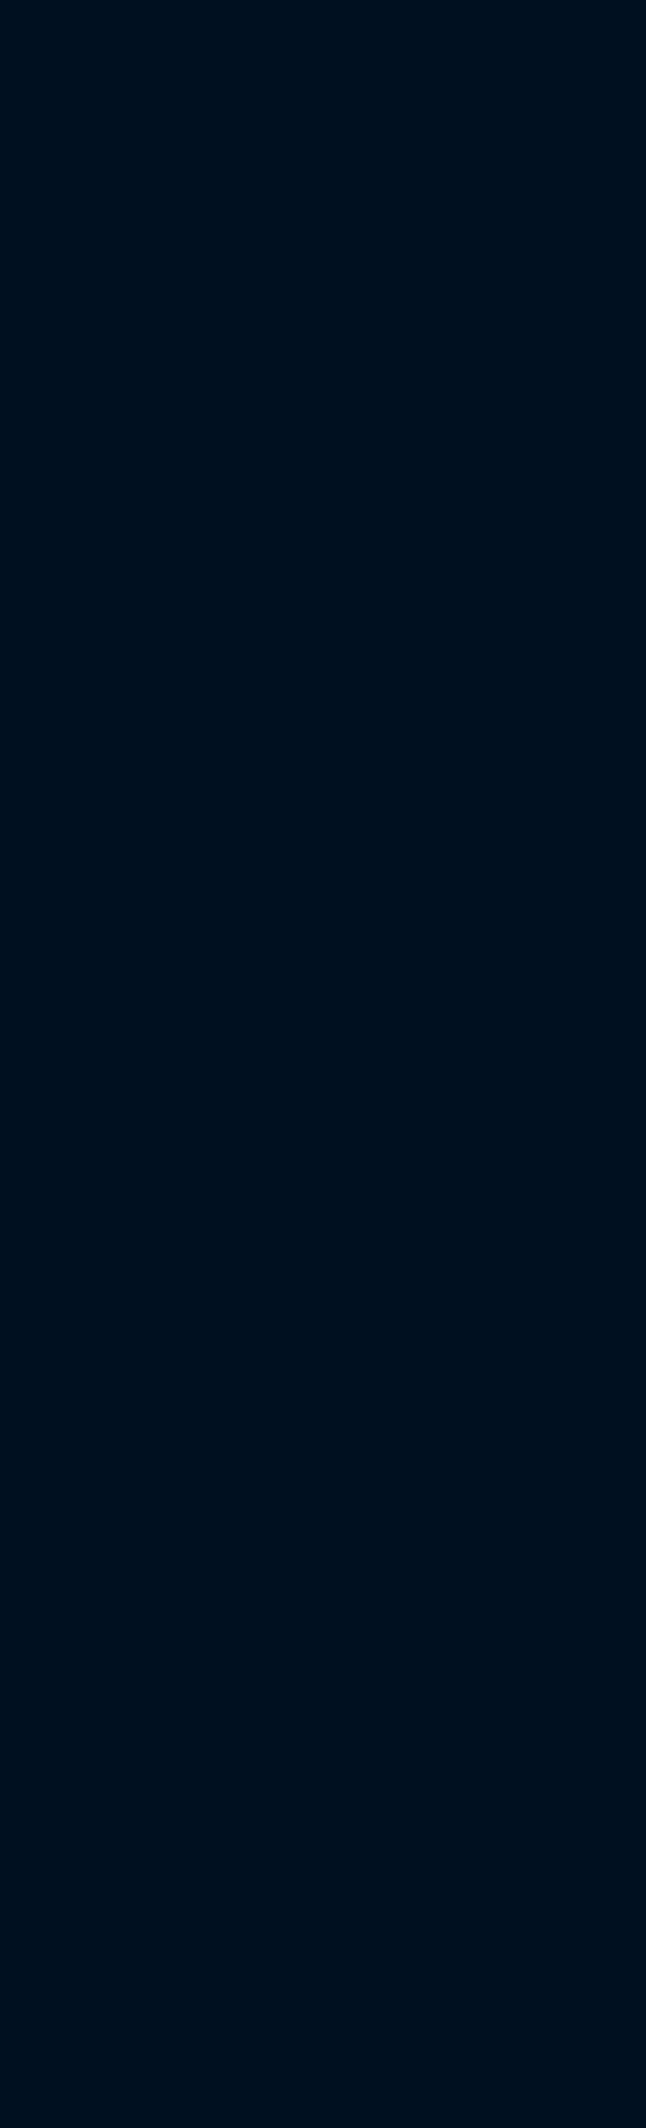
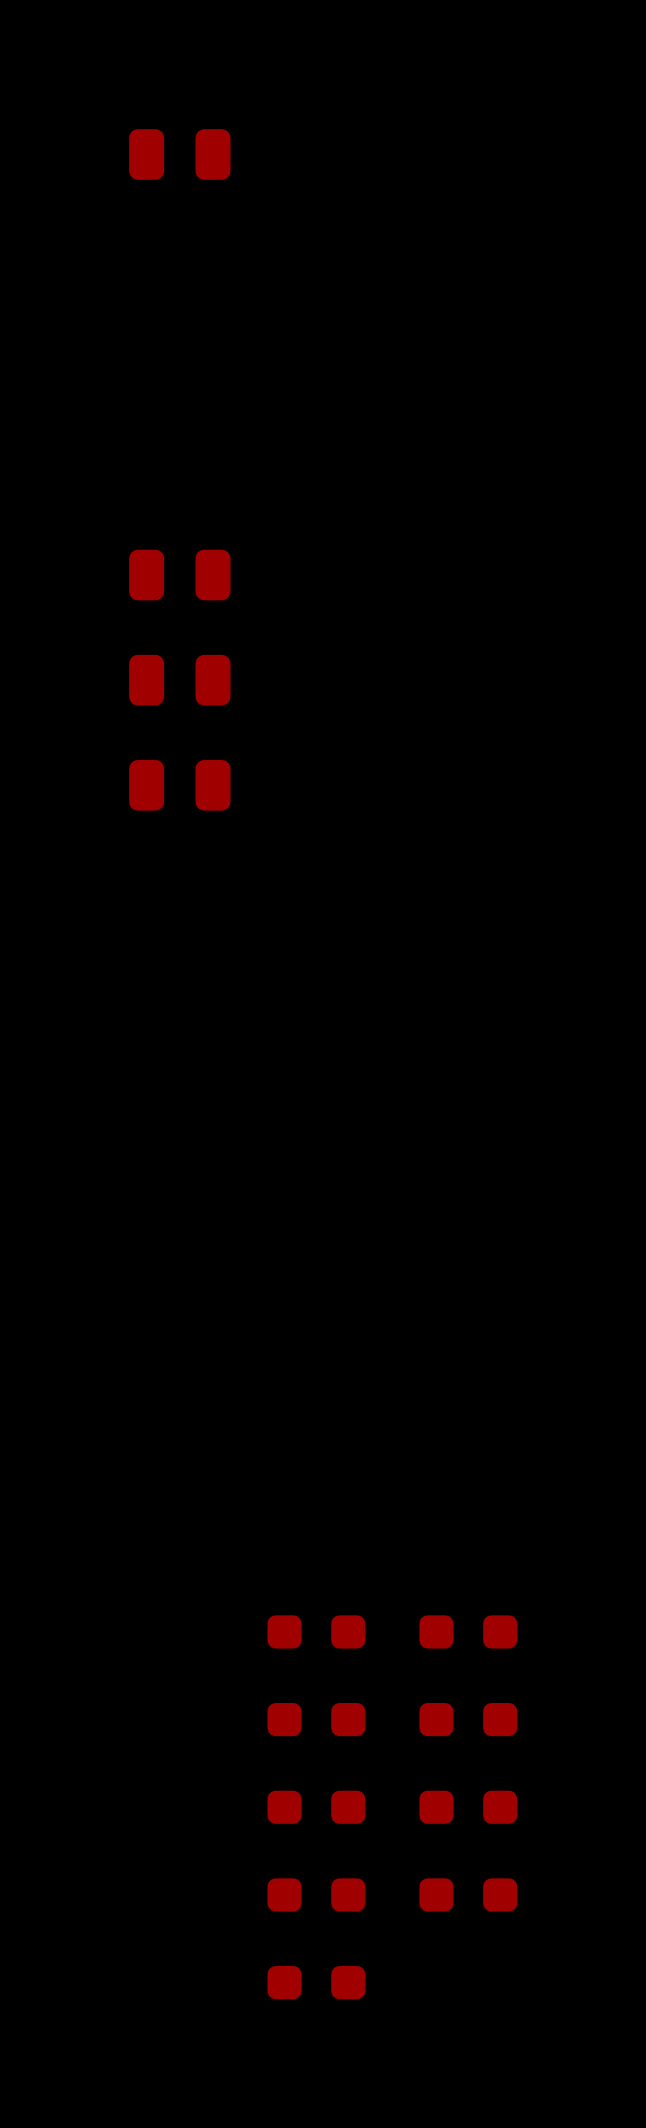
part: none -> (179, 154)
part: none -> (179, 575)
part: none -> (179, 680)
part: none -> (179, 785)
part: none -> (316, 1631)
part: none -> (468, 1631)
part: none -> (316, 1719)
part: none -> (468, 1719)
part: none -> (316, 1807)
part: none -> (468, 1807)
part: none -> (316, 1894)
part: none -> (468, 1894)
part: none -> (316, 1982)

